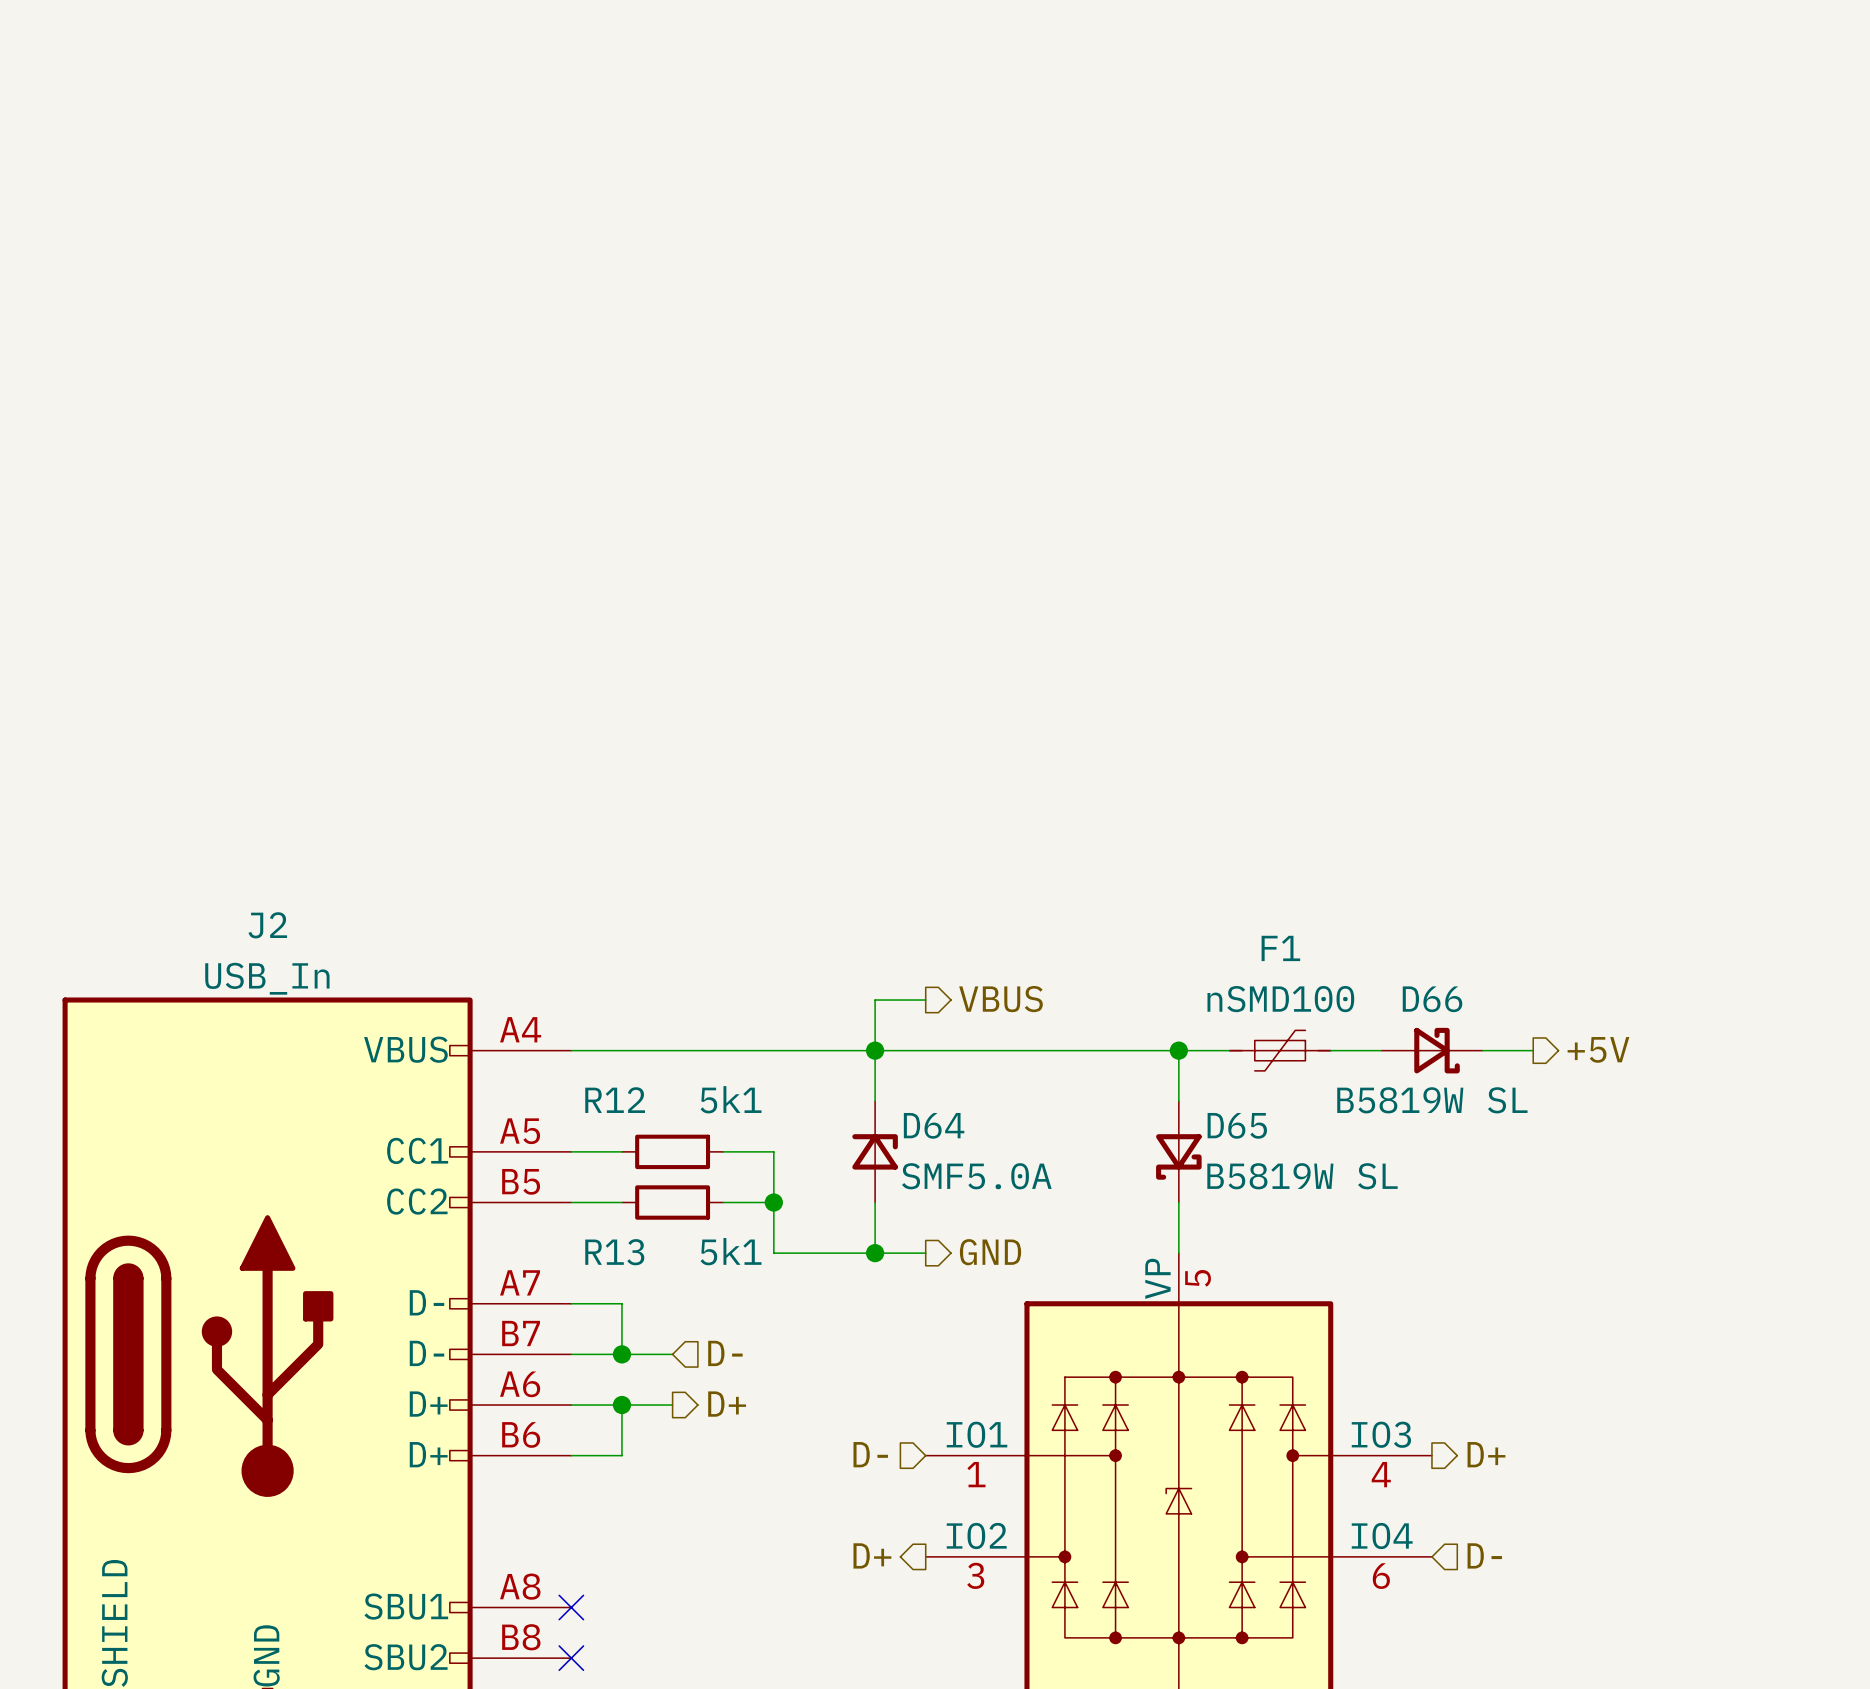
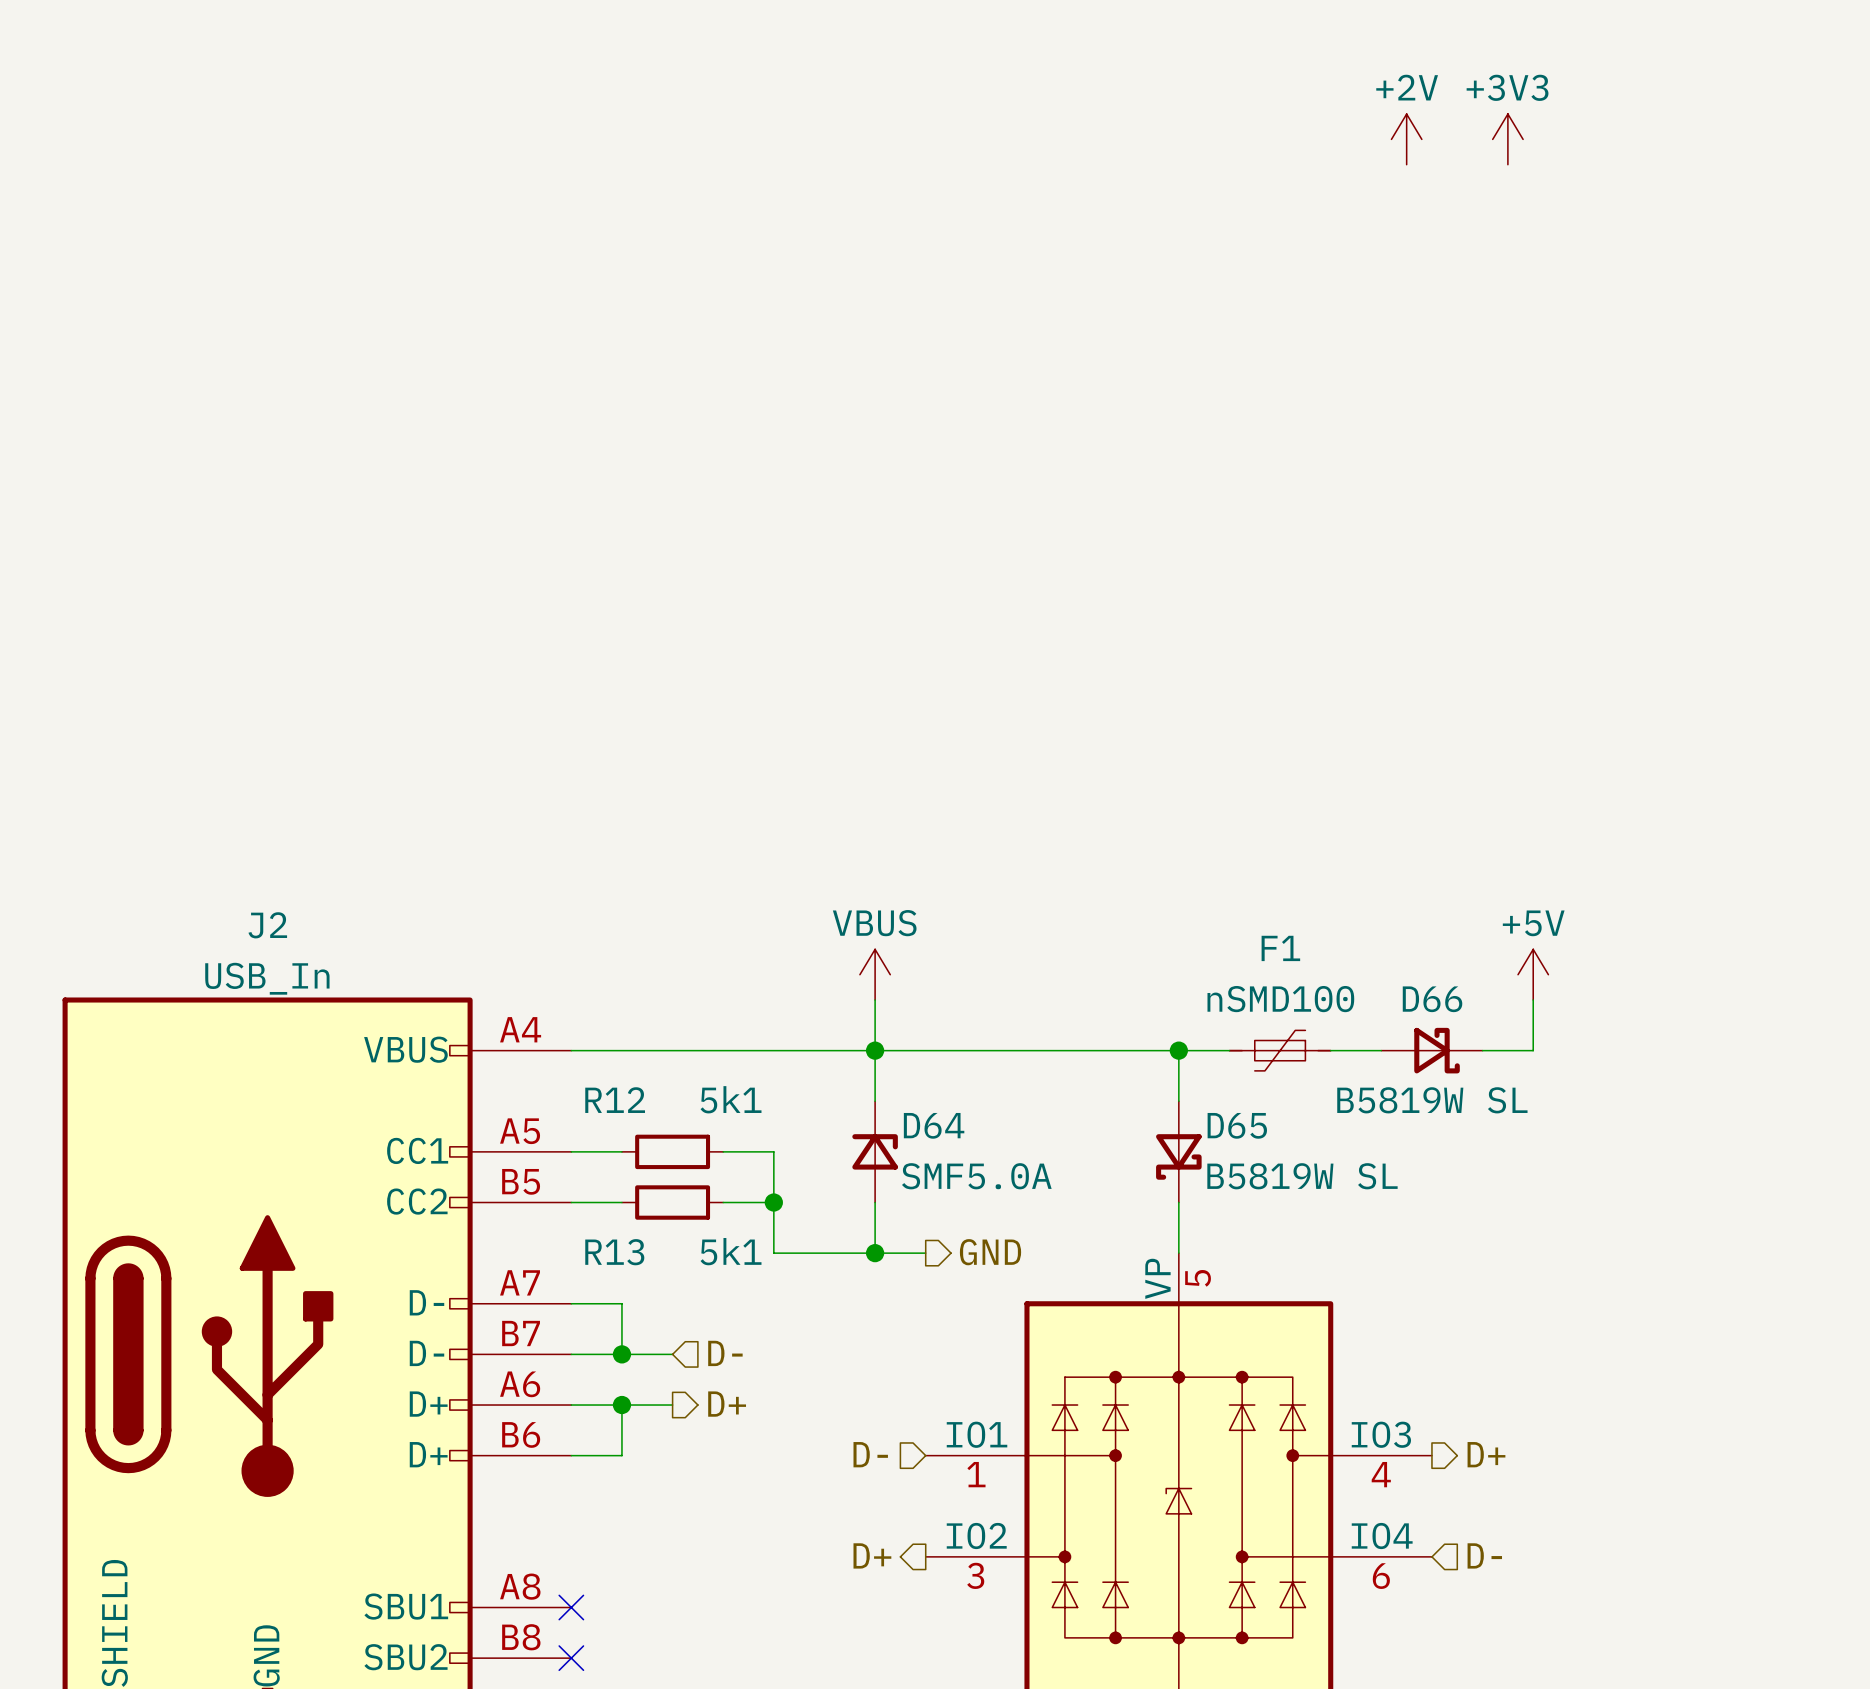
power symbol: none -> +2V (1406, 139)
power symbol: none -> +3V3 (1507, 139)
power symbol: none -> VBUS (875, 974)
power symbol: none -> +5V (1533, 974)
hierarchical label: VBUS (1000, 999) -> none
wire: (875, 1000) (925, 1000) -> none
wire: none -> (1533, 1000) (1533, 1050)
hierarchical label: +5V (1598, 1049) -> none

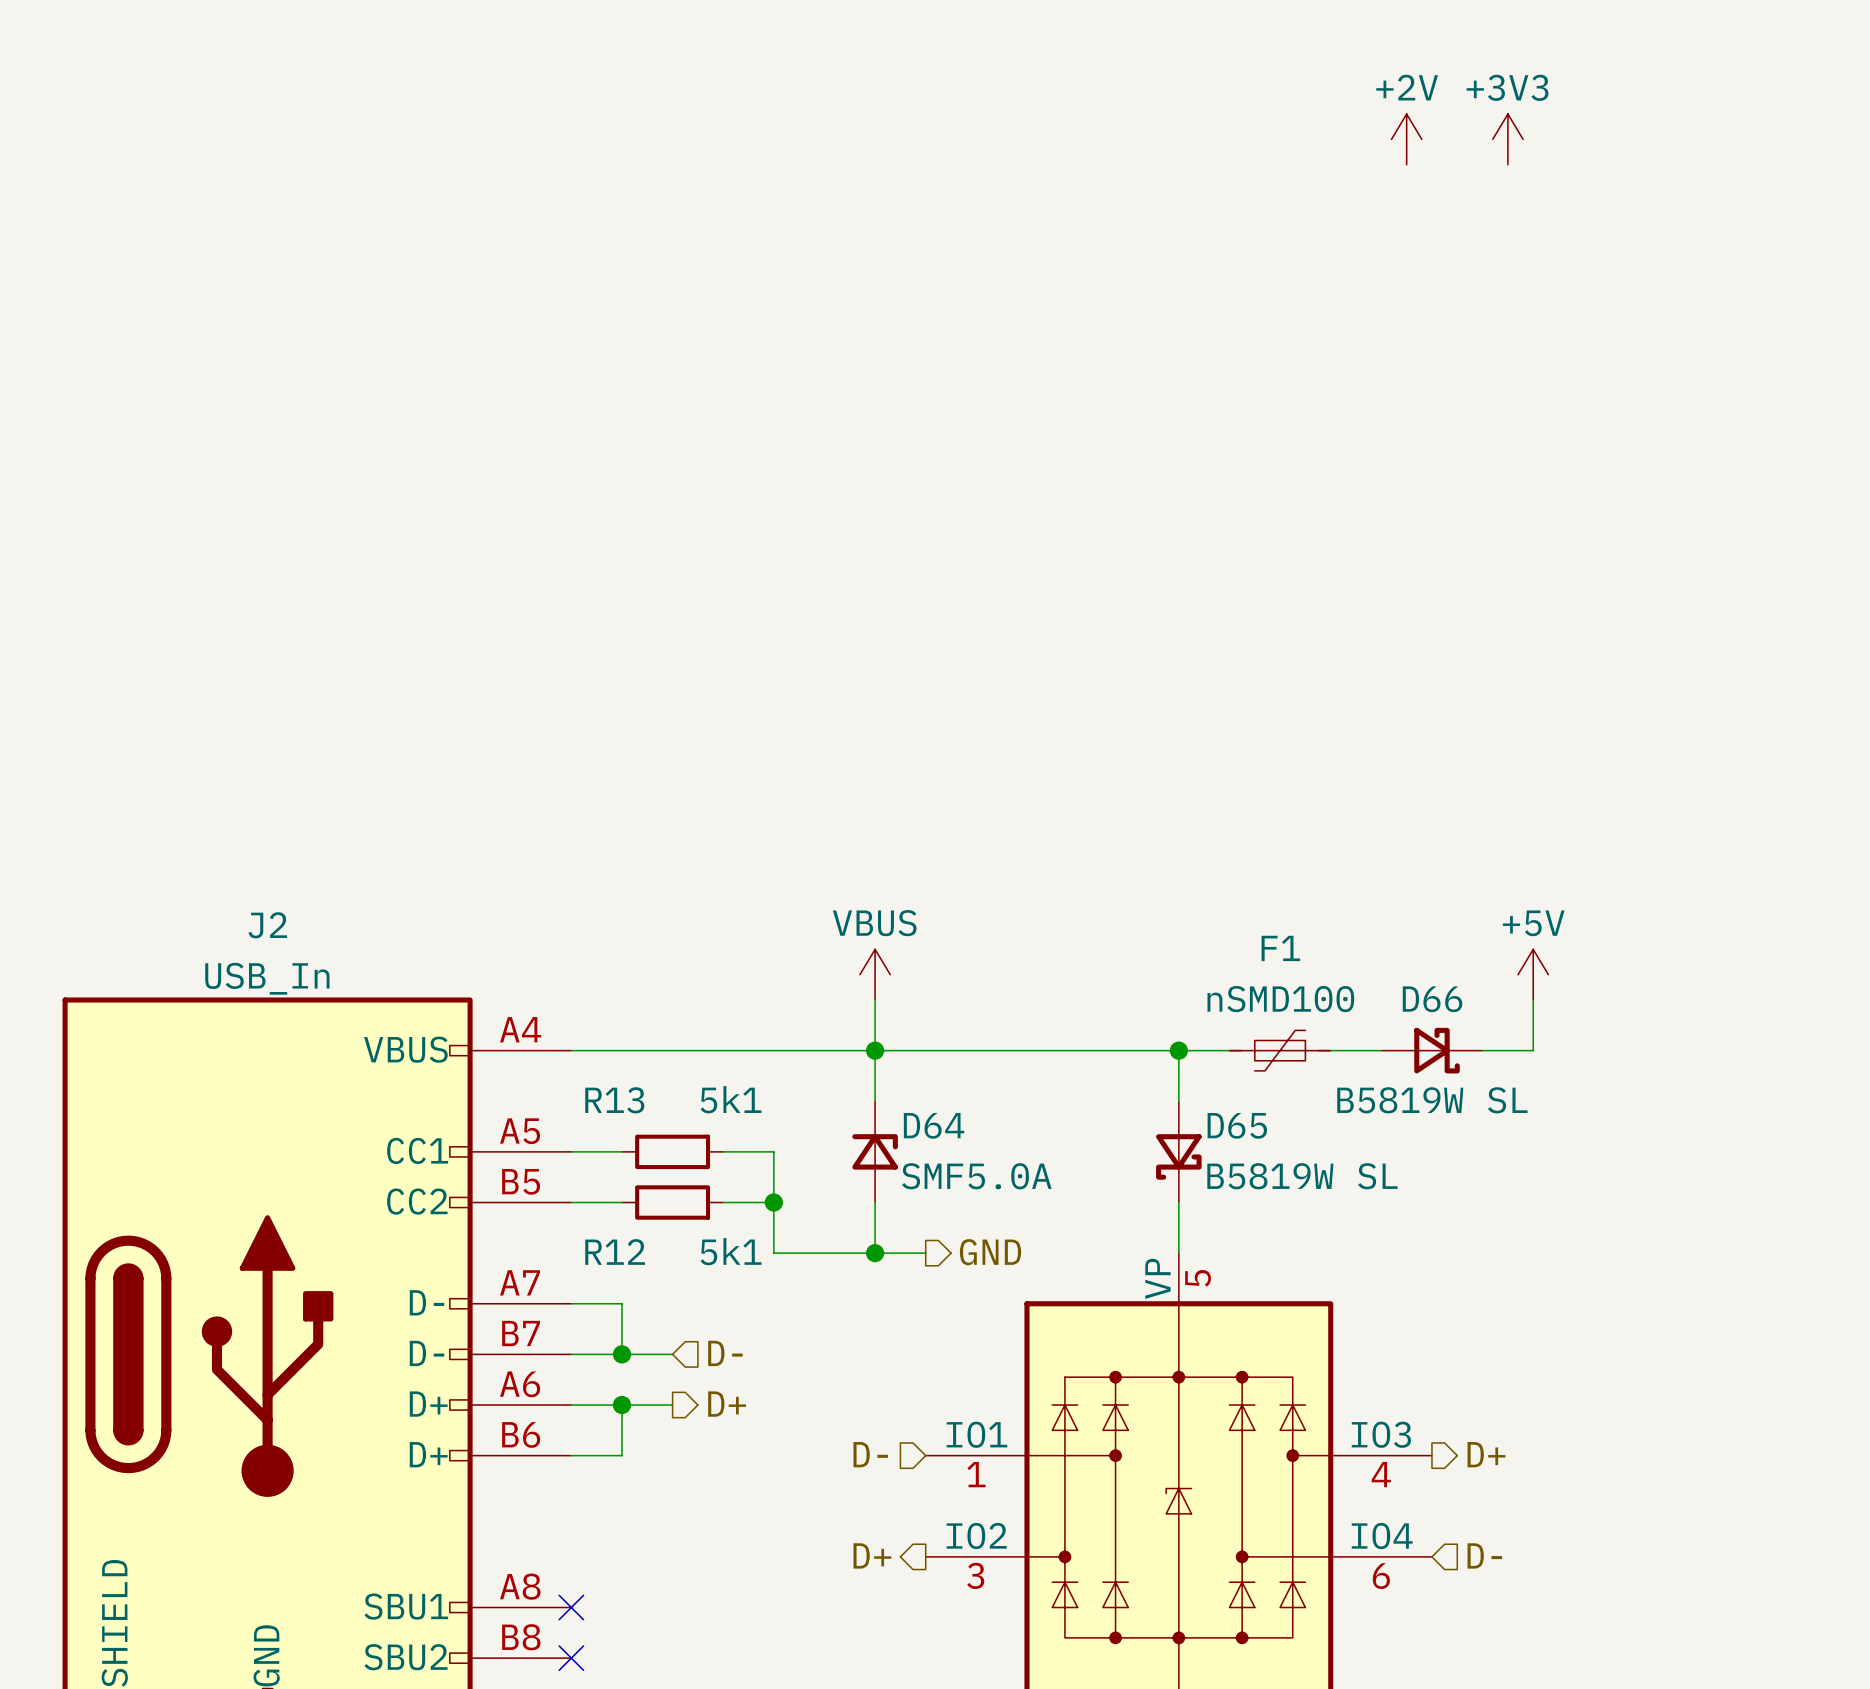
R12 name: R12 (615, 1100) -> R13 (614, 1100)
R13 name: R13 (614, 1252) -> R12 (615, 1251)

